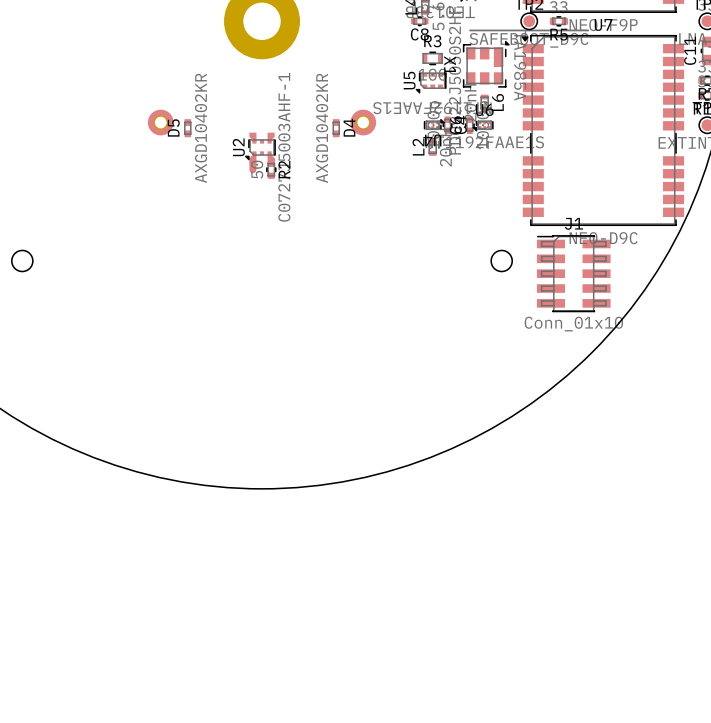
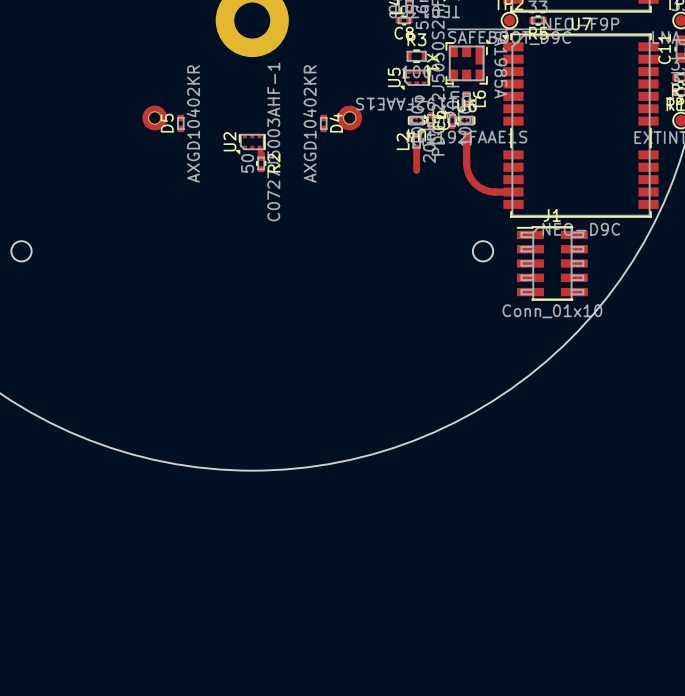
drawing: [249, 132, 275, 163] -> none
top track: none -> (466, 134) (466, 167) (472, 180) (487, 191) (513, 192)
top track: none -> (416, 147) (416, 170)
top track: (252, 162) (252, 169) -> none

